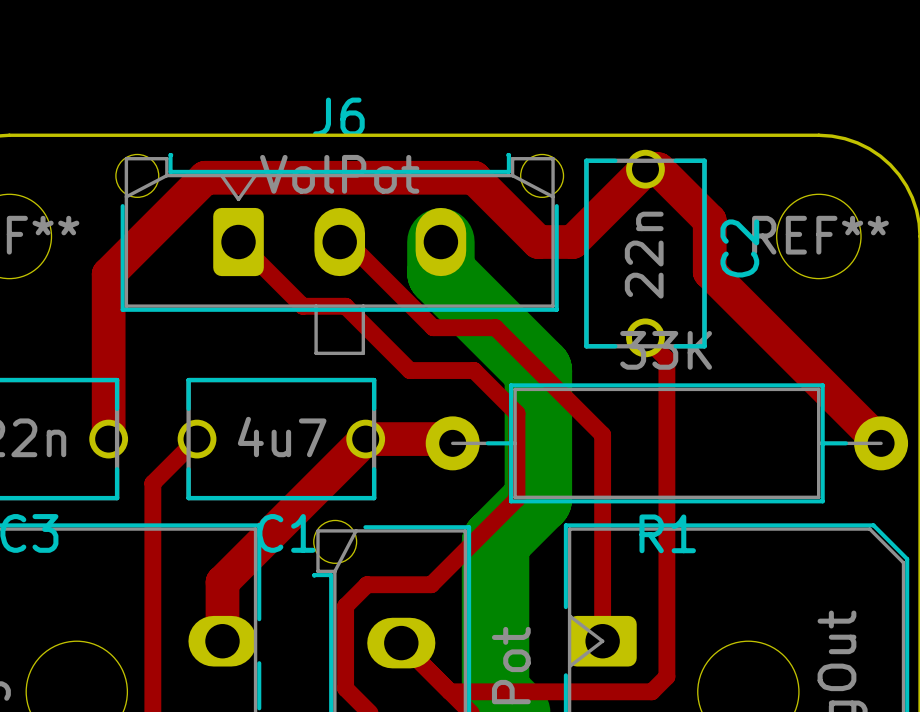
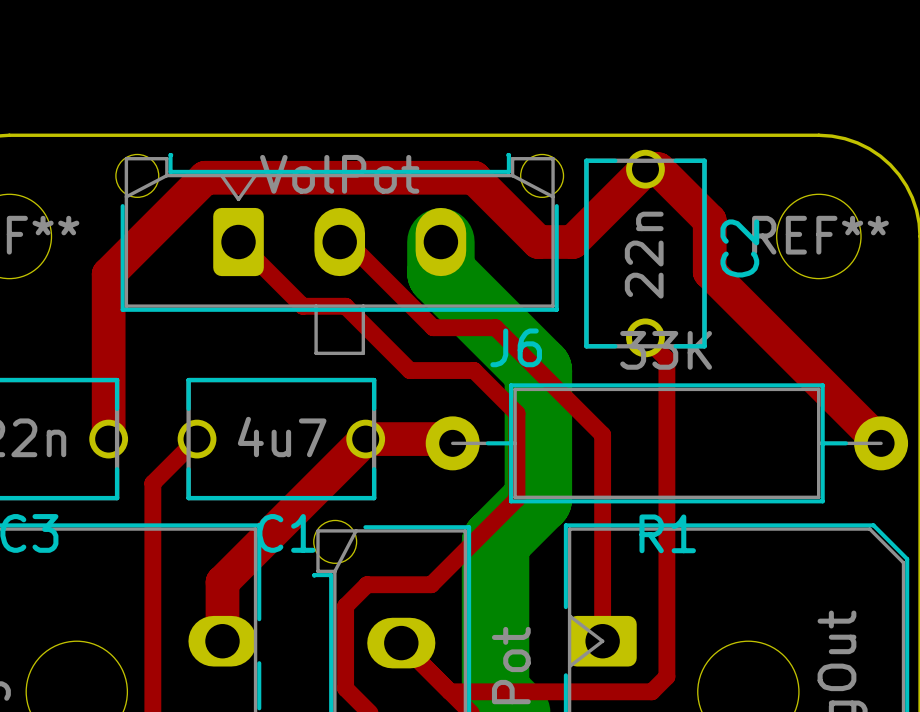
J6 name position: J6 (338, 116) -> J6 (516, 347)

